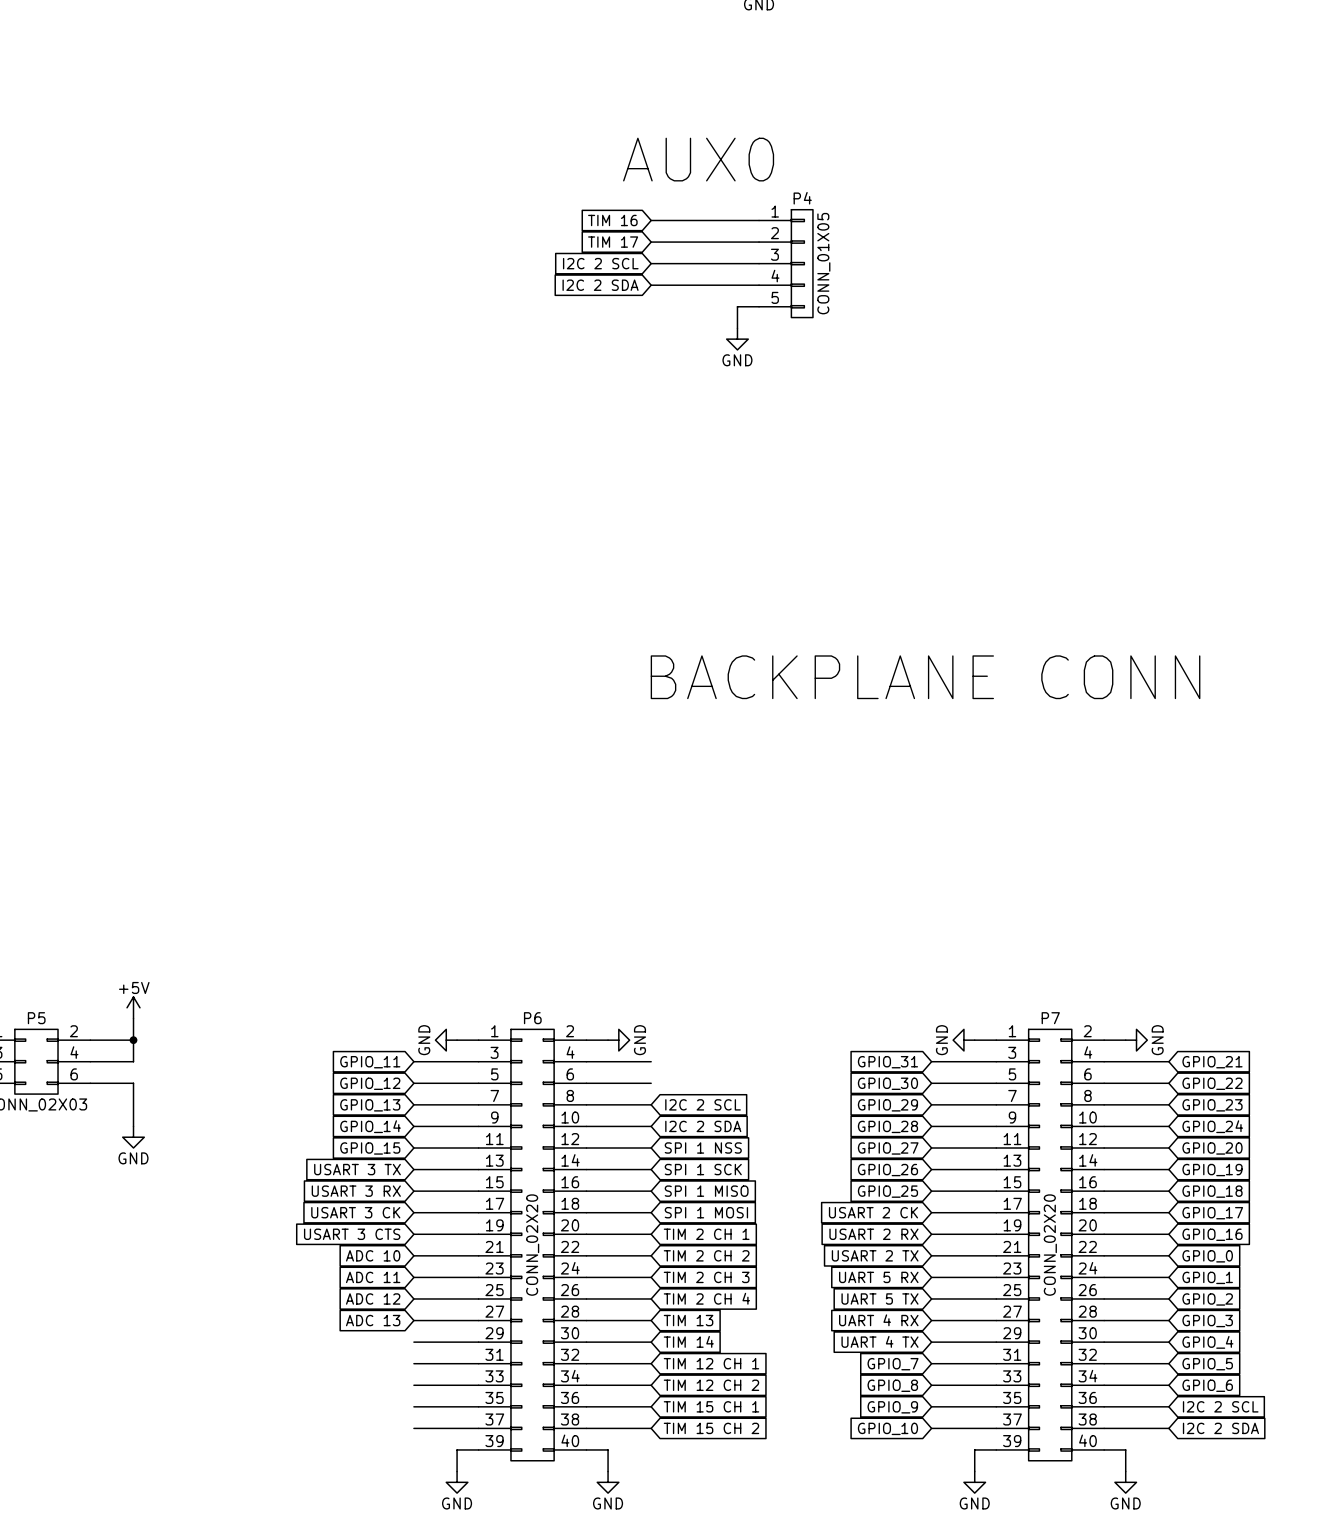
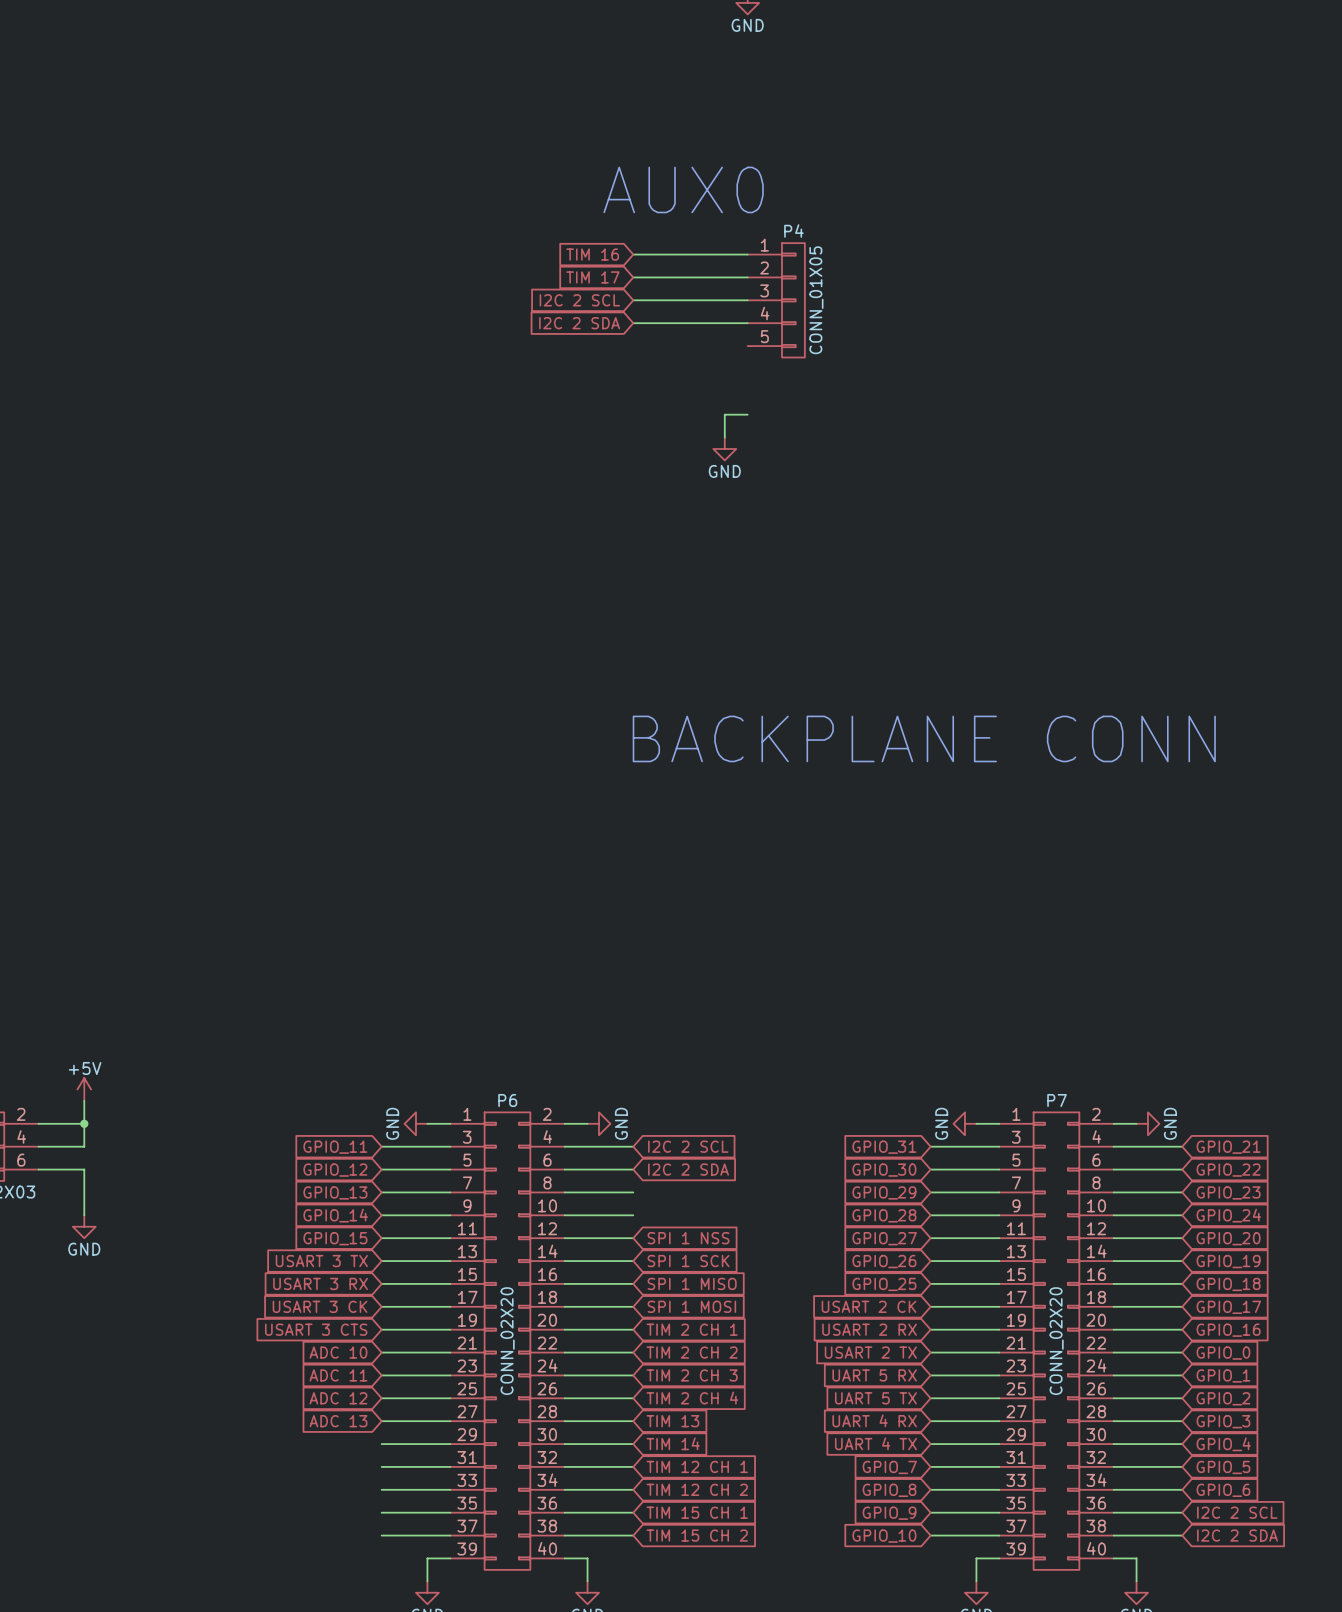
wire: (759, 306) (737, 306) (737, 328) -> (747, 414) (724, 414) (724, 437)
power symbol position: GND (737, 339) -> GND (724, 449)
global label position: I2C 2 SCL (703, 1104) -> I2C 2 SCL (688, 1146)
global label position: I2C 2 SDA (703, 1126) -> I2C 2 SDA (688, 1169)

